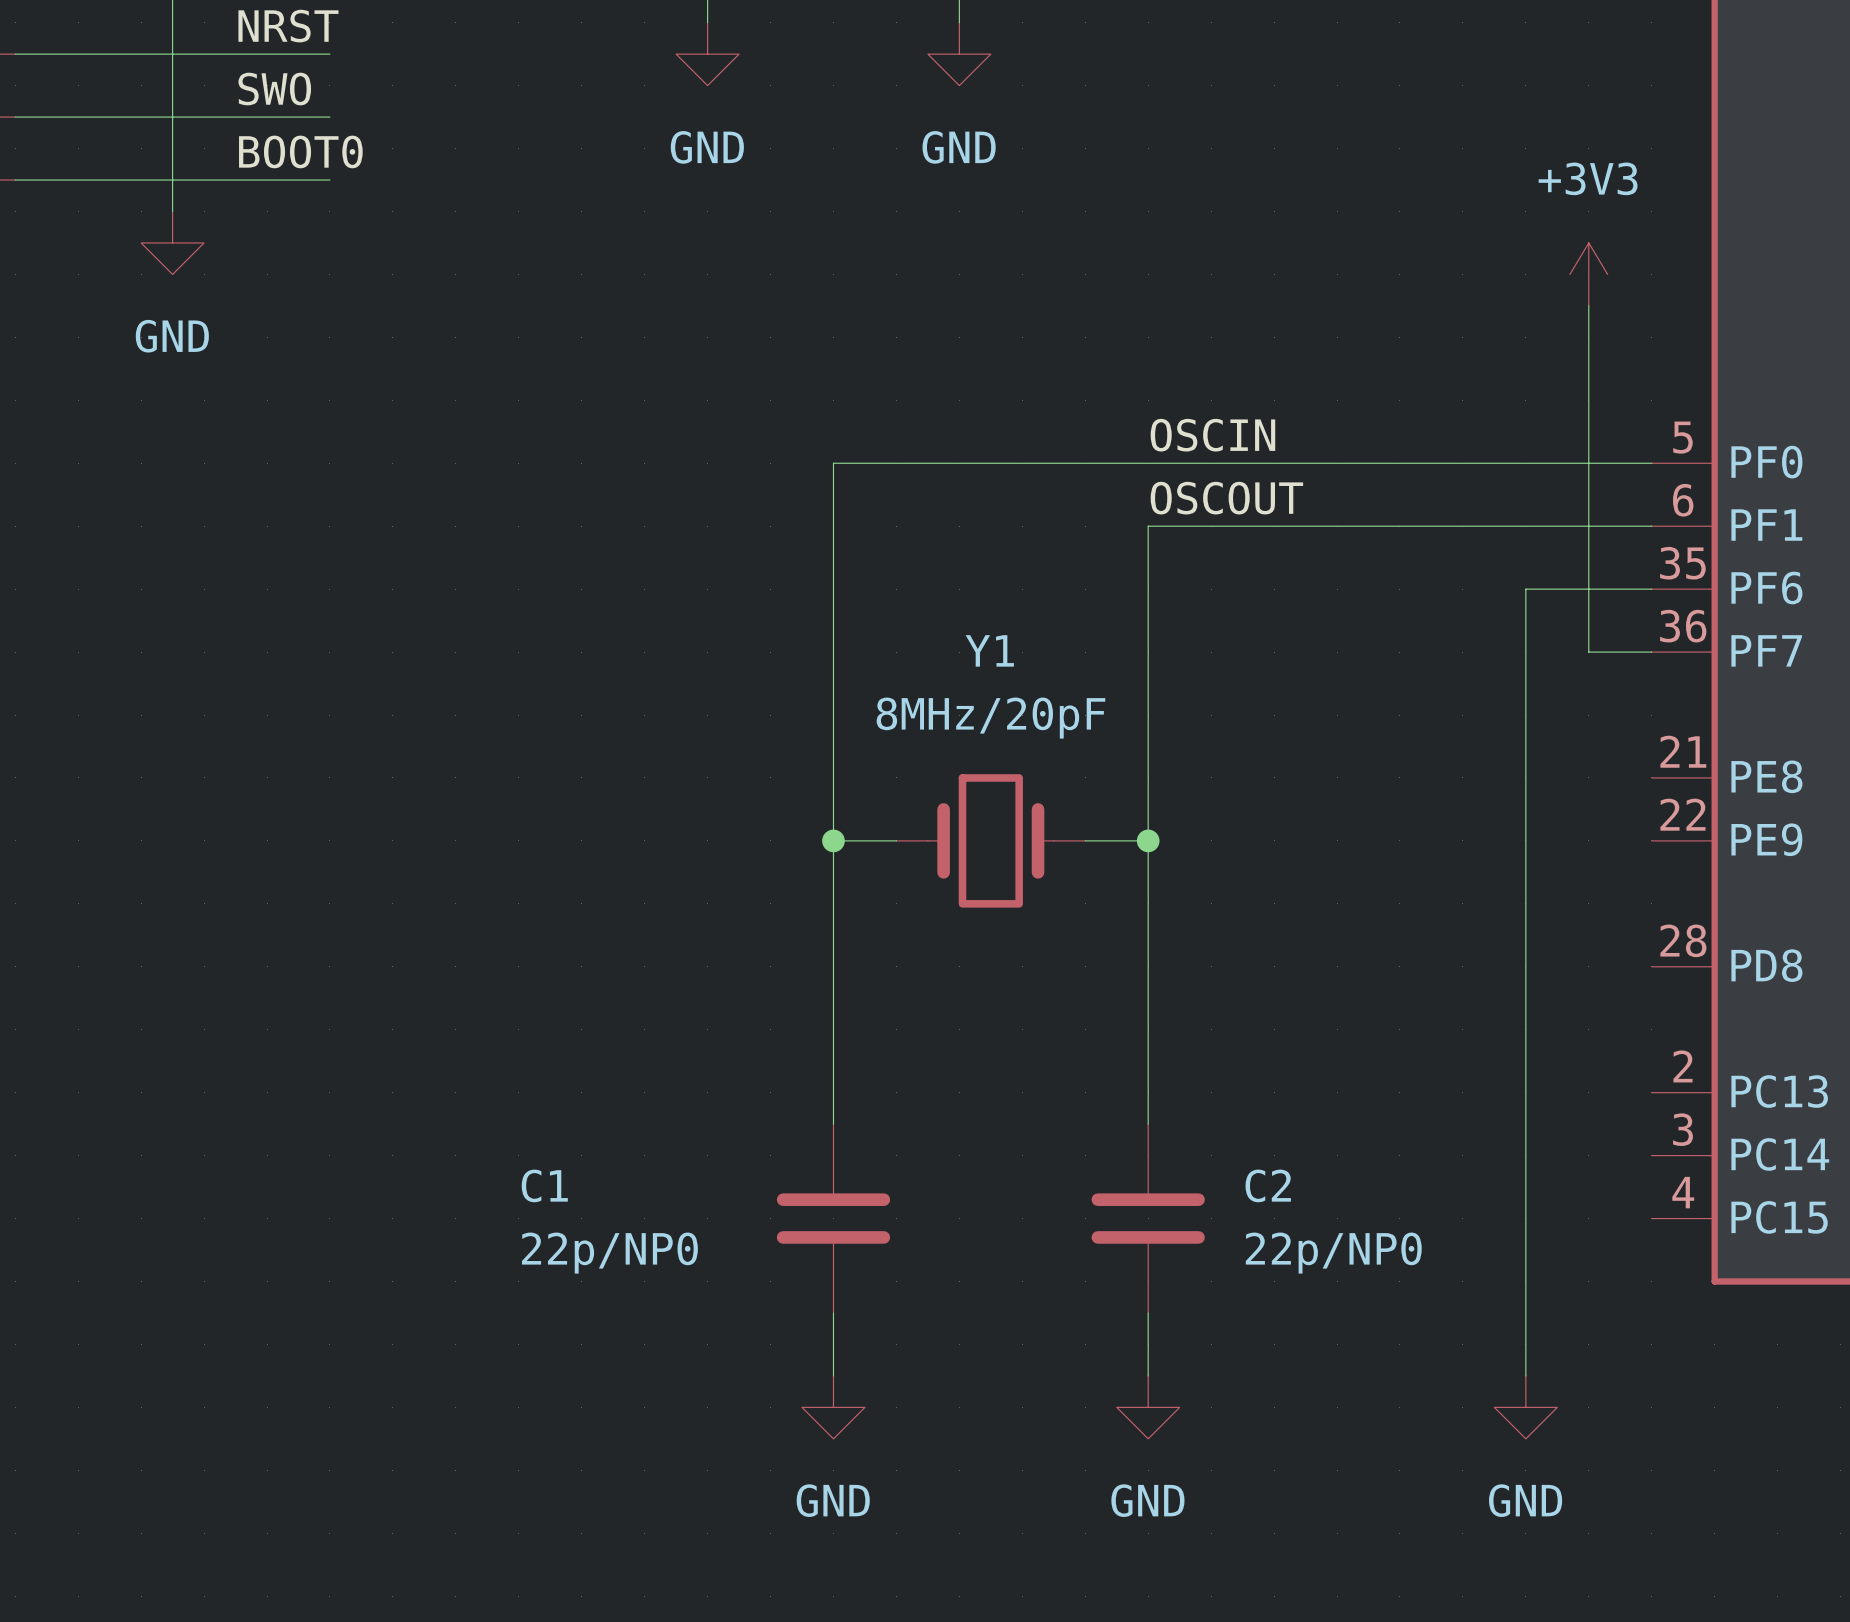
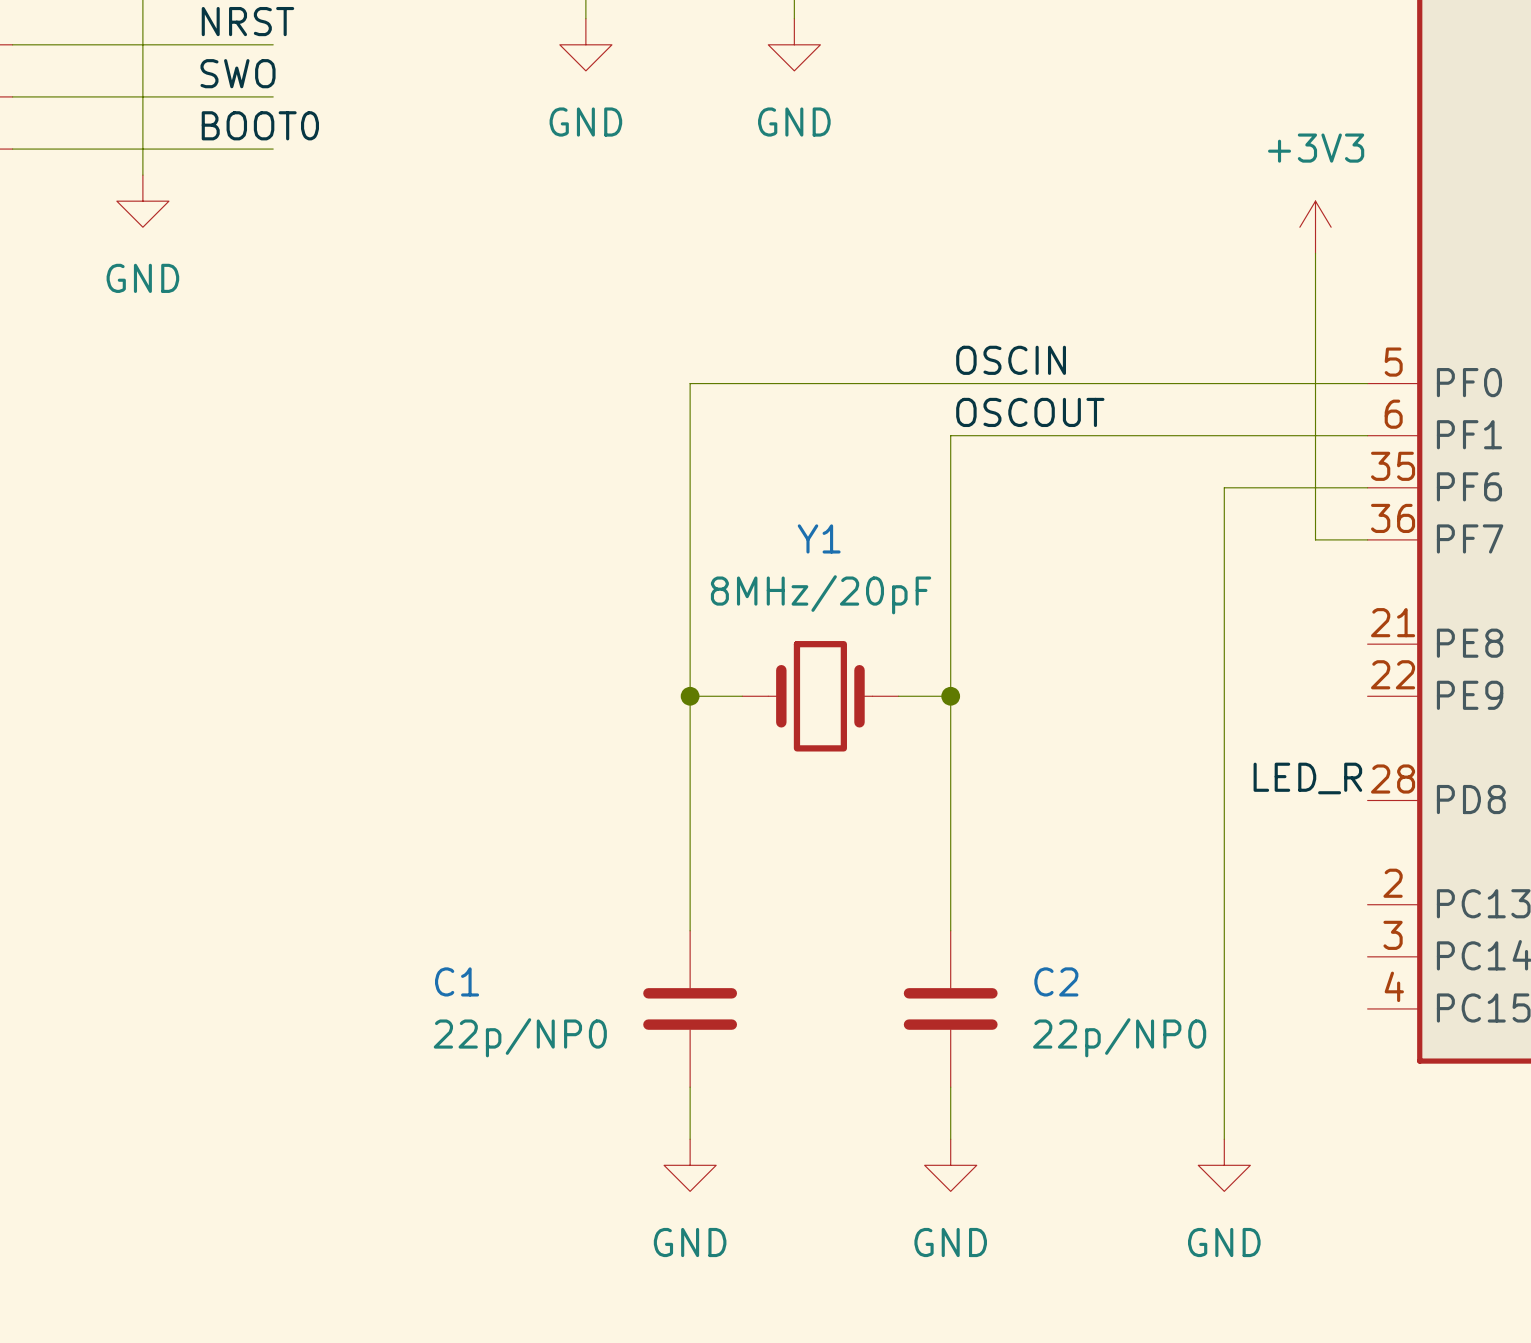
wire: (1525, 589) (1525, 1375) -> (1263, 487) (1224, 487) (1224, 1139)
label: none -> LED_R (1307, 778)
power symbol position: GND (1525, 1407) -> GND (1224, 1165)

